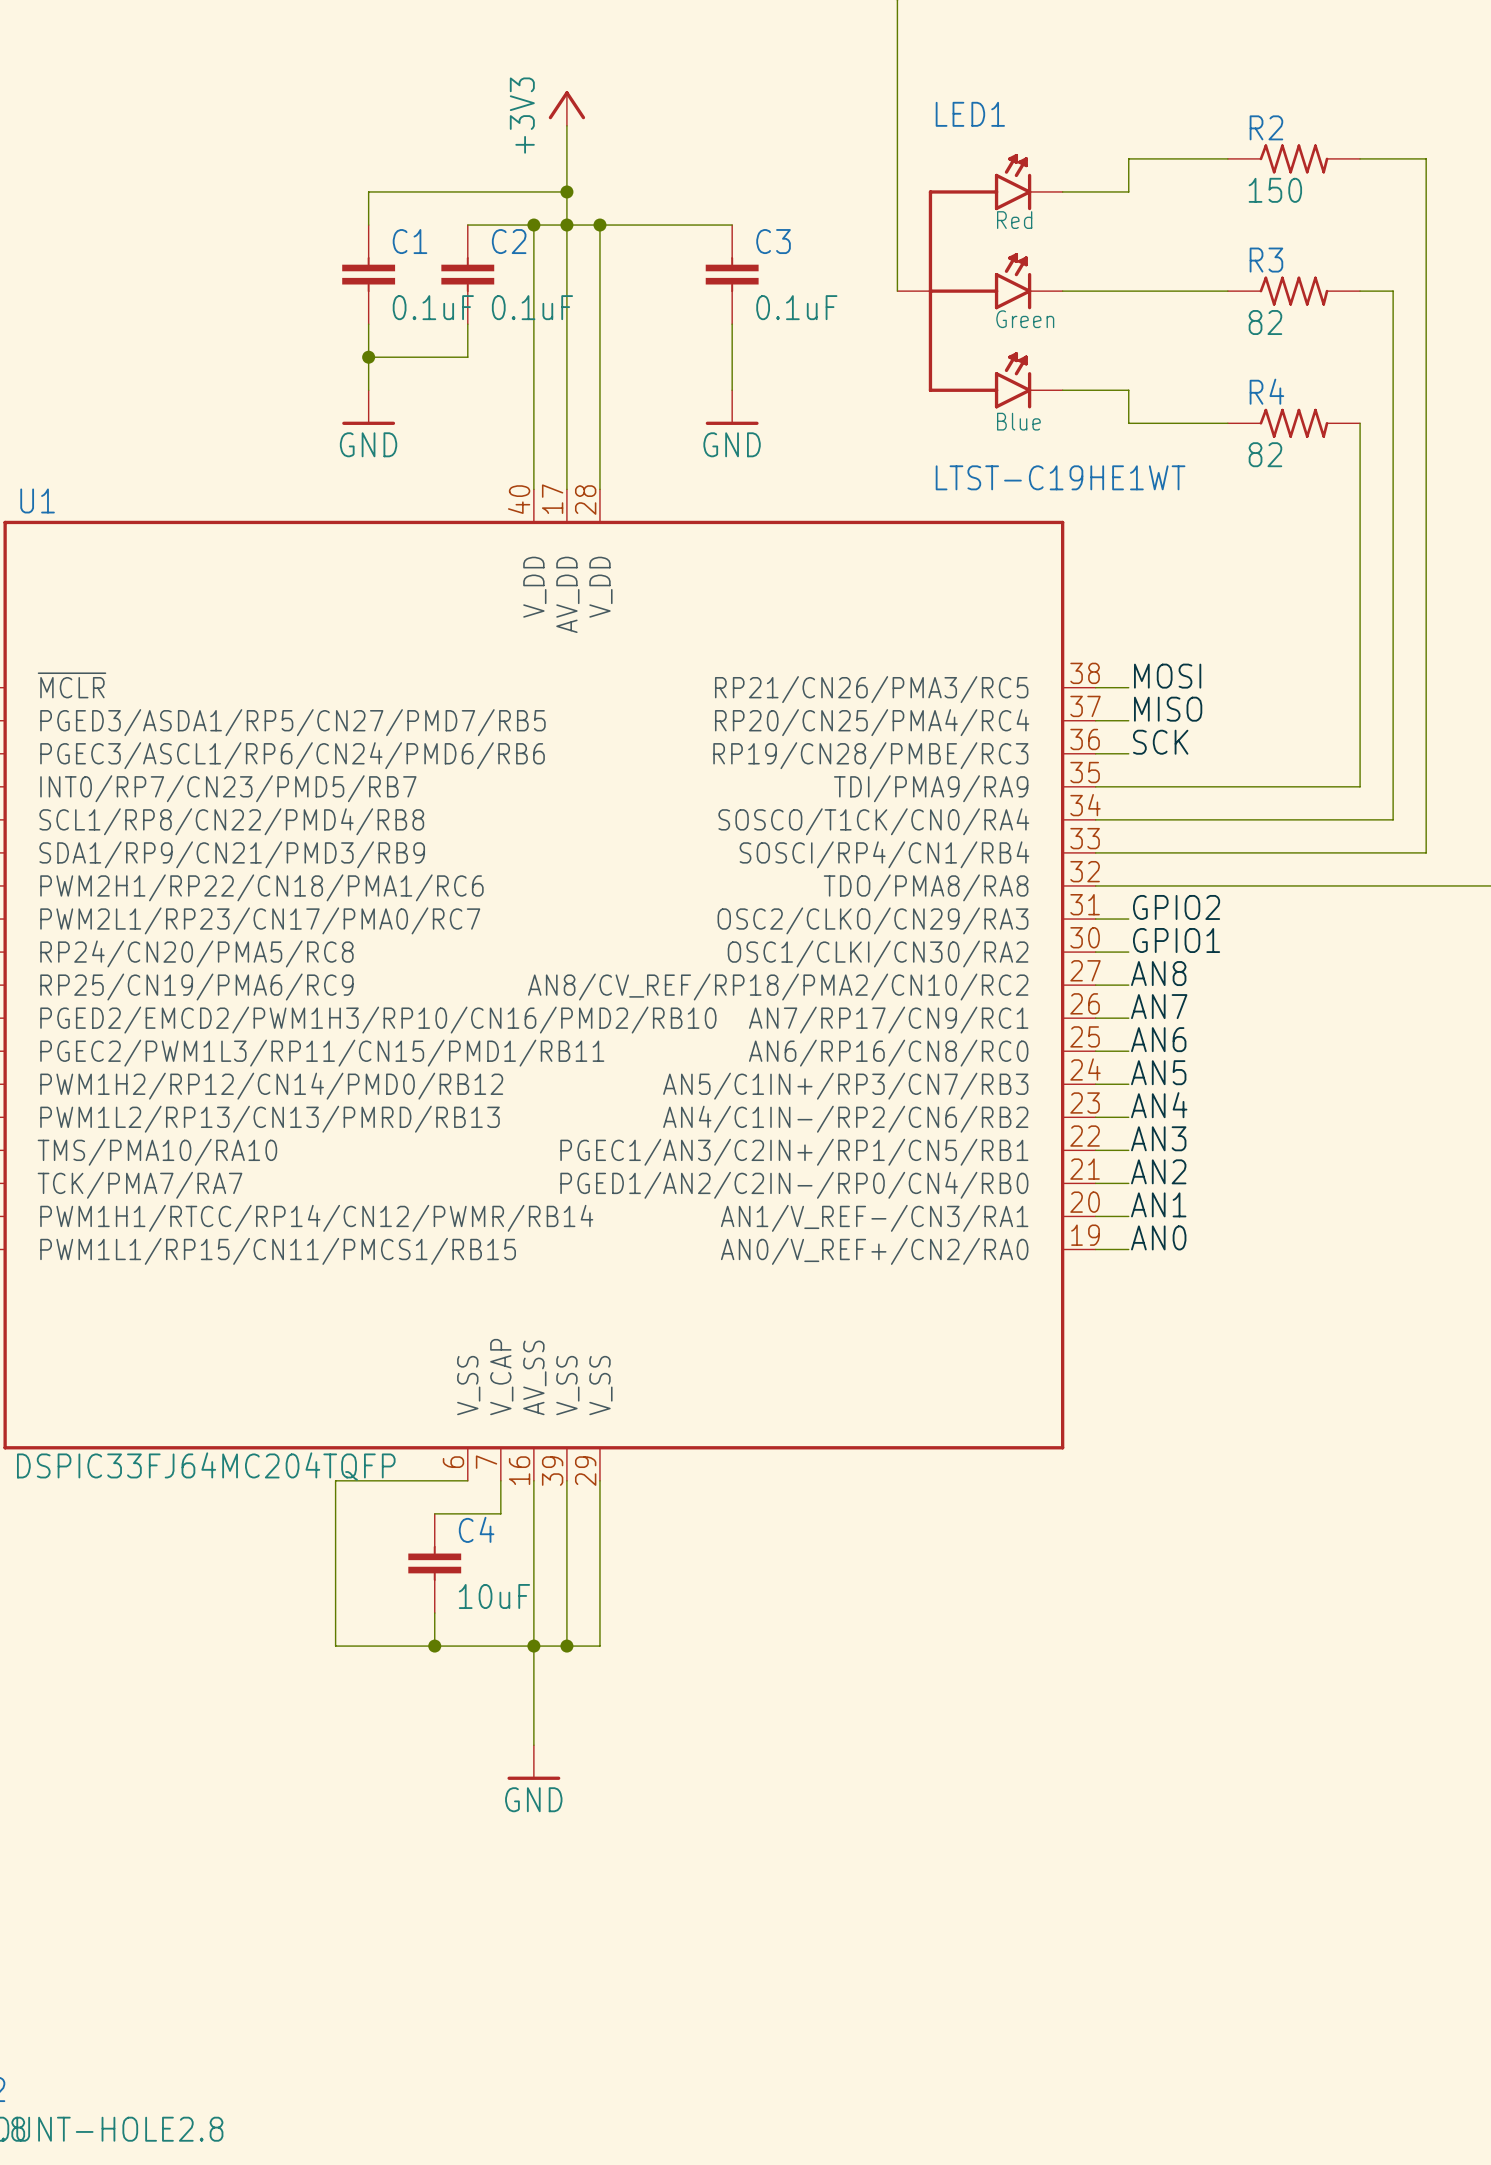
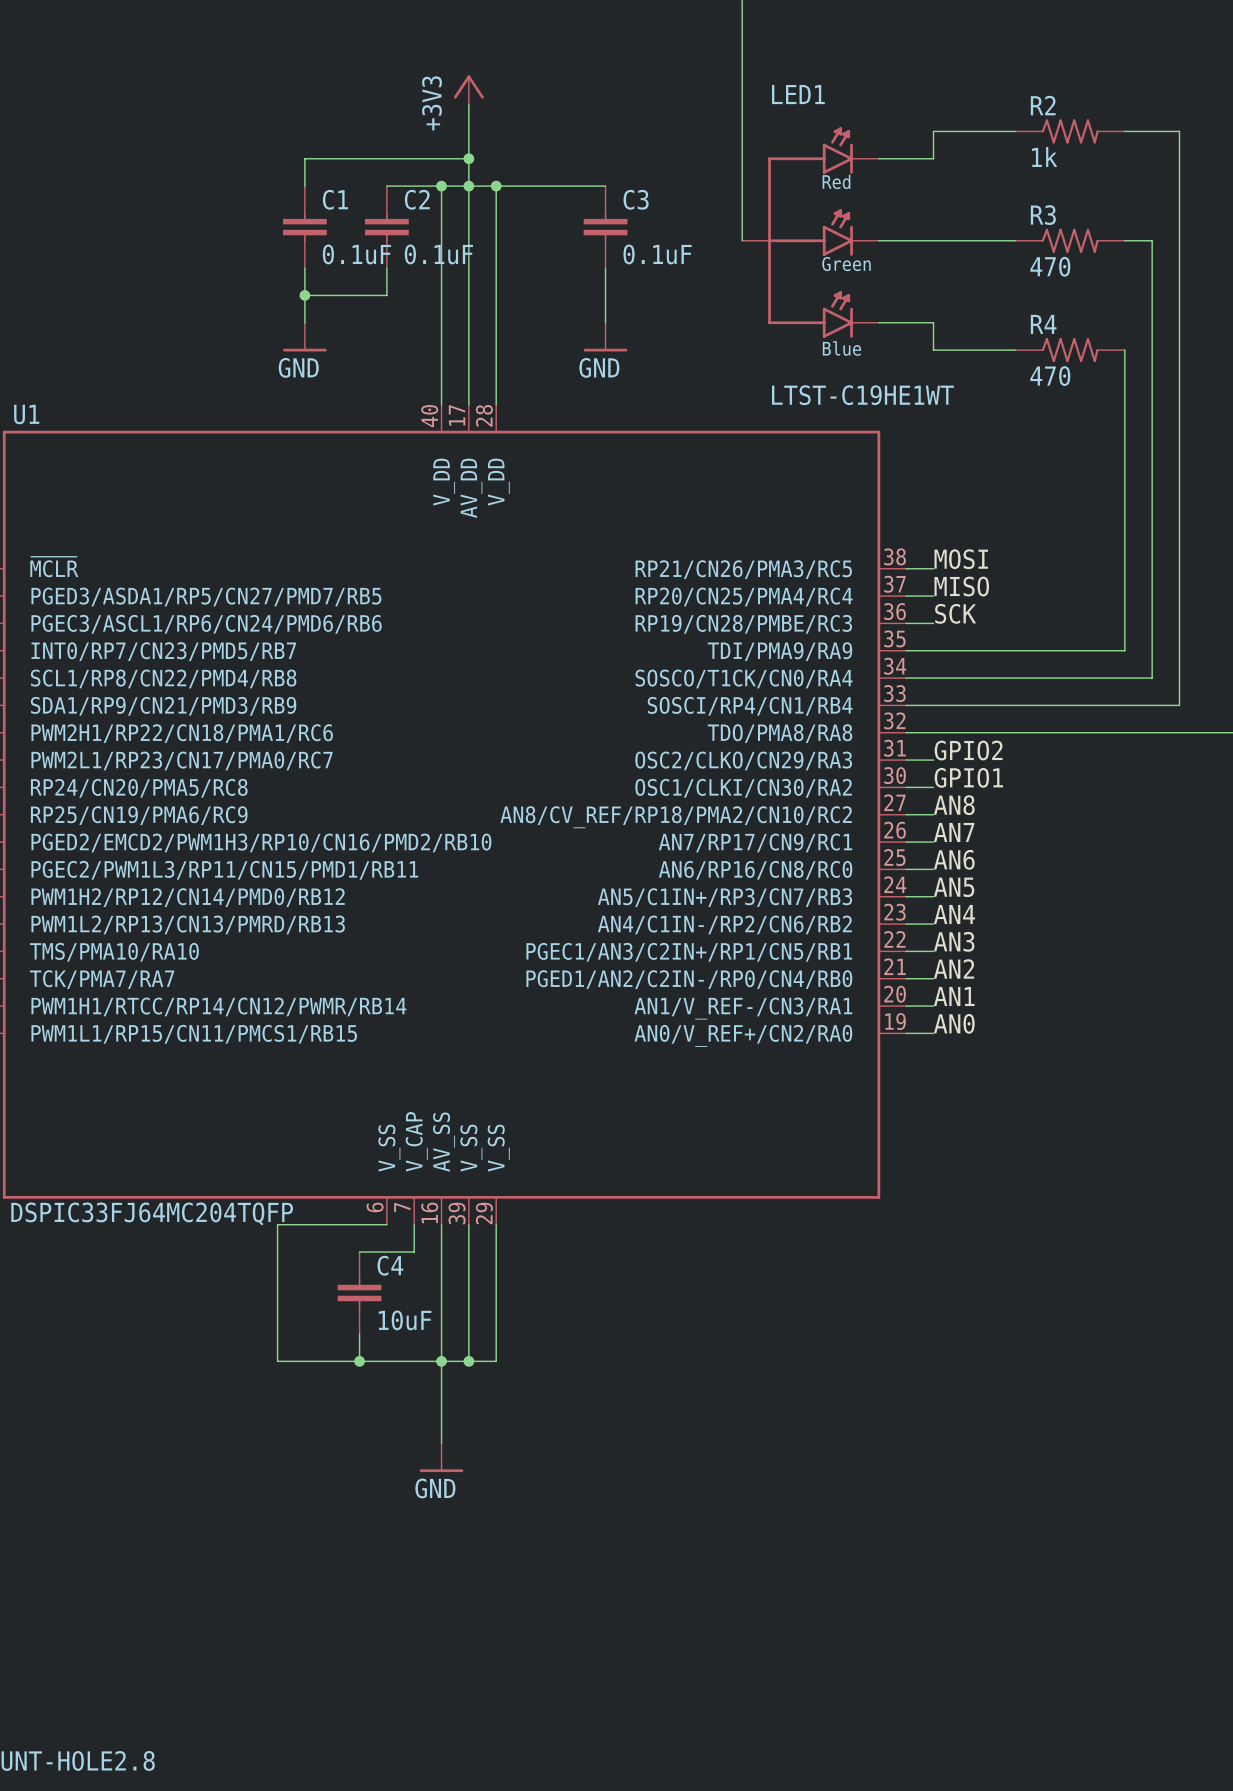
R2 value: 150 (1275, 190) -> 1k (1044, 157)
R3 value: 82 (1265, 322) -> 470 (1050, 266)
R4 value: 82 (1265, 454) -> 470 (1050, 376)

